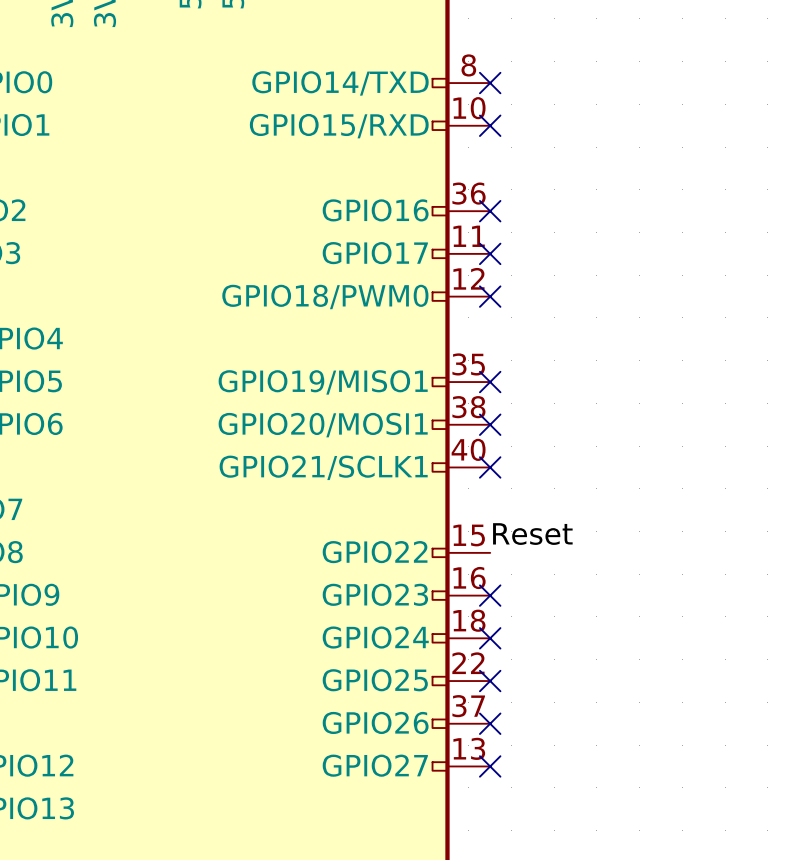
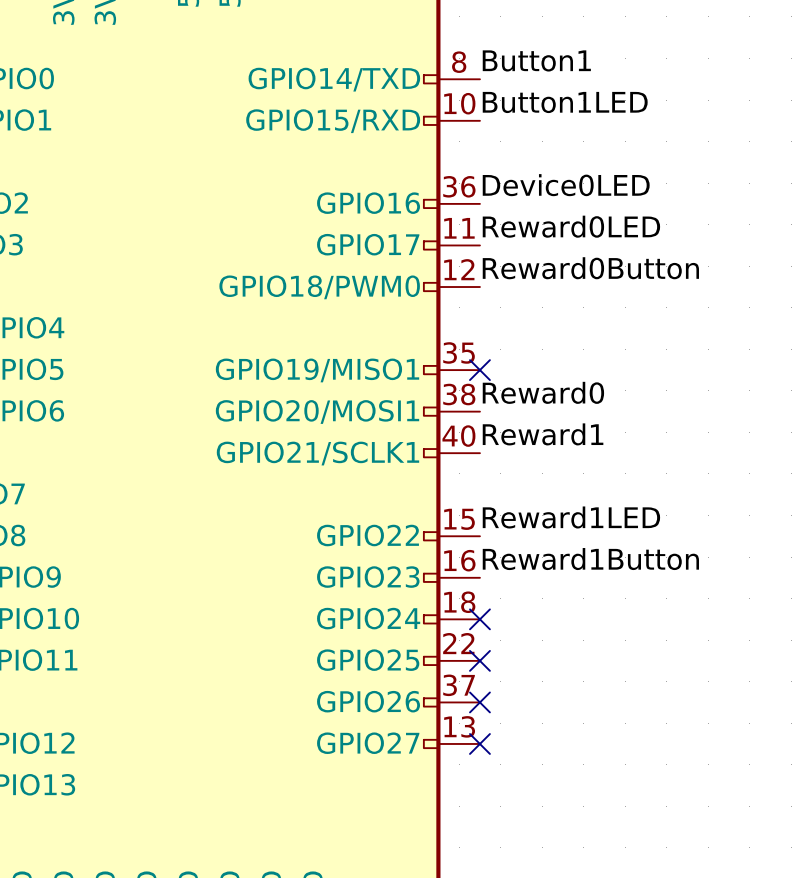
label: none -> Button1 (536, 60)
no-connect mark: (490, 83) -> none
label: none -> Button1LED (565, 102)
no-connect mark: (490, 125) -> none
label: none -> Device0LED (566, 185)
no-connect mark: (490, 211) -> none
label: none -> Reward0LED (571, 226)
no-connect mark: (490, 253) -> none
label: none -> Reward0Button (590, 268)
no-connect mark: (490, 296) -> none
label: none -> Reward0 (543, 392)
no-connect mark: (490, 424) -> none
label: none -> Reward1 (543, 434)
no-connect mark: (490, 467) -> none
label: Reset (532, 534) -> Reward1LED (571, 517)
label: none -> Reward1Button (590, 559)
no-connect mark: (490, 595) -> none

